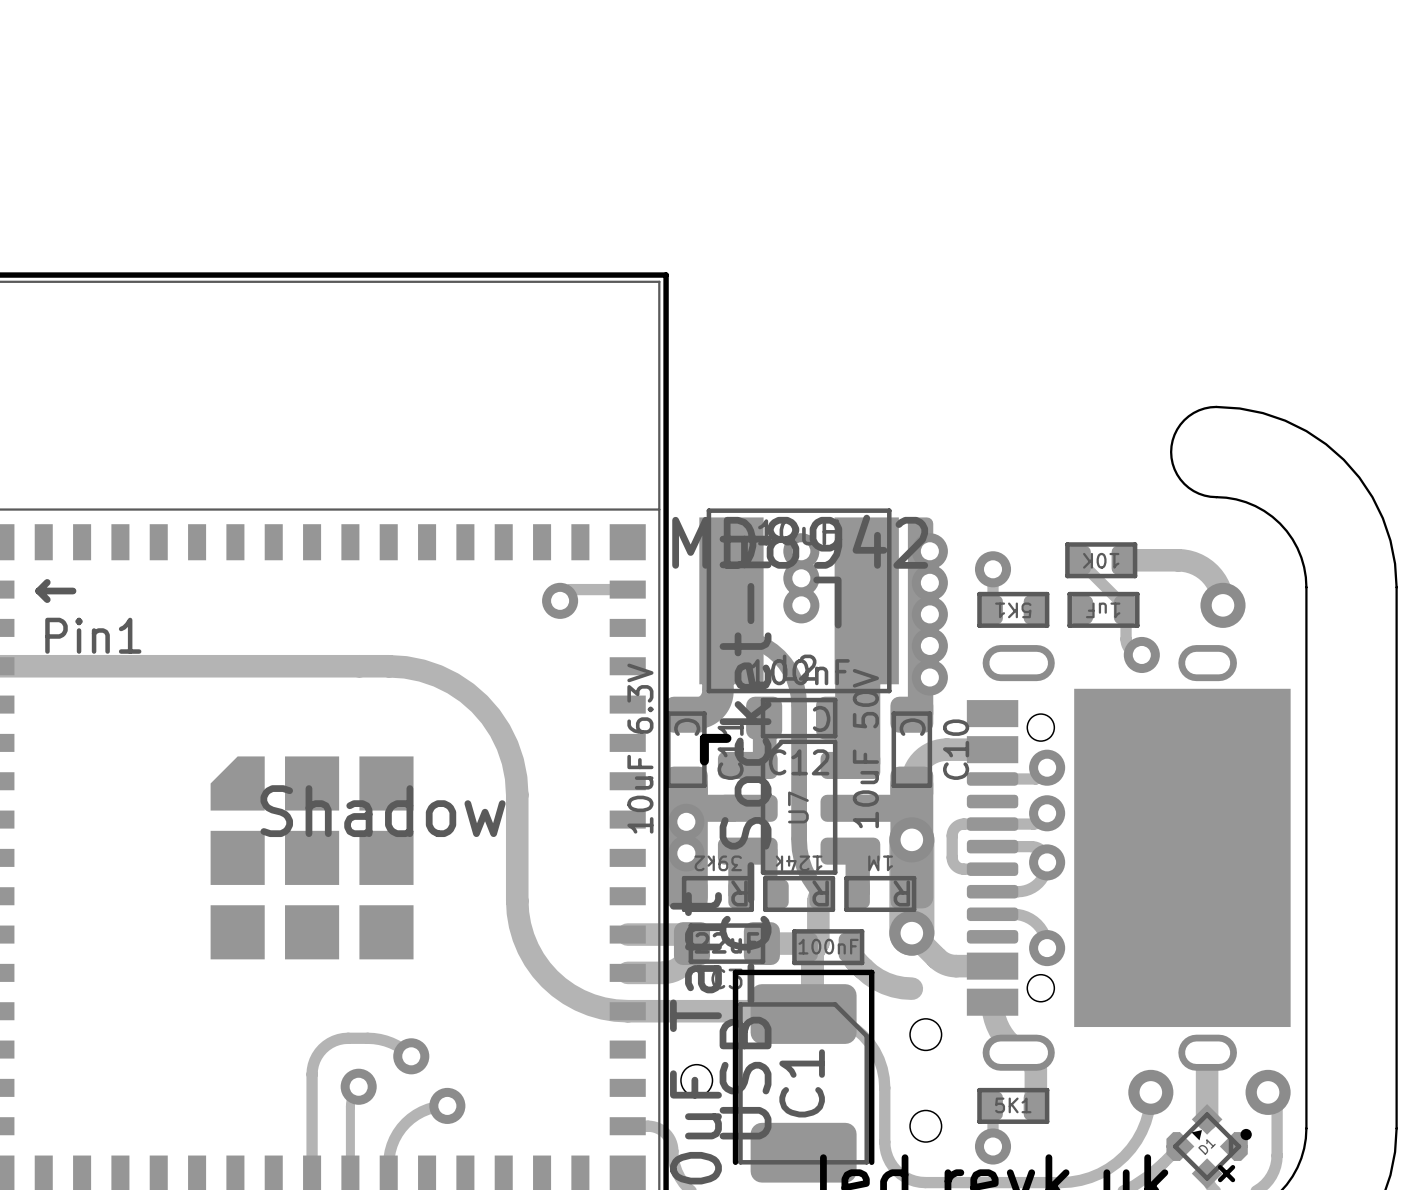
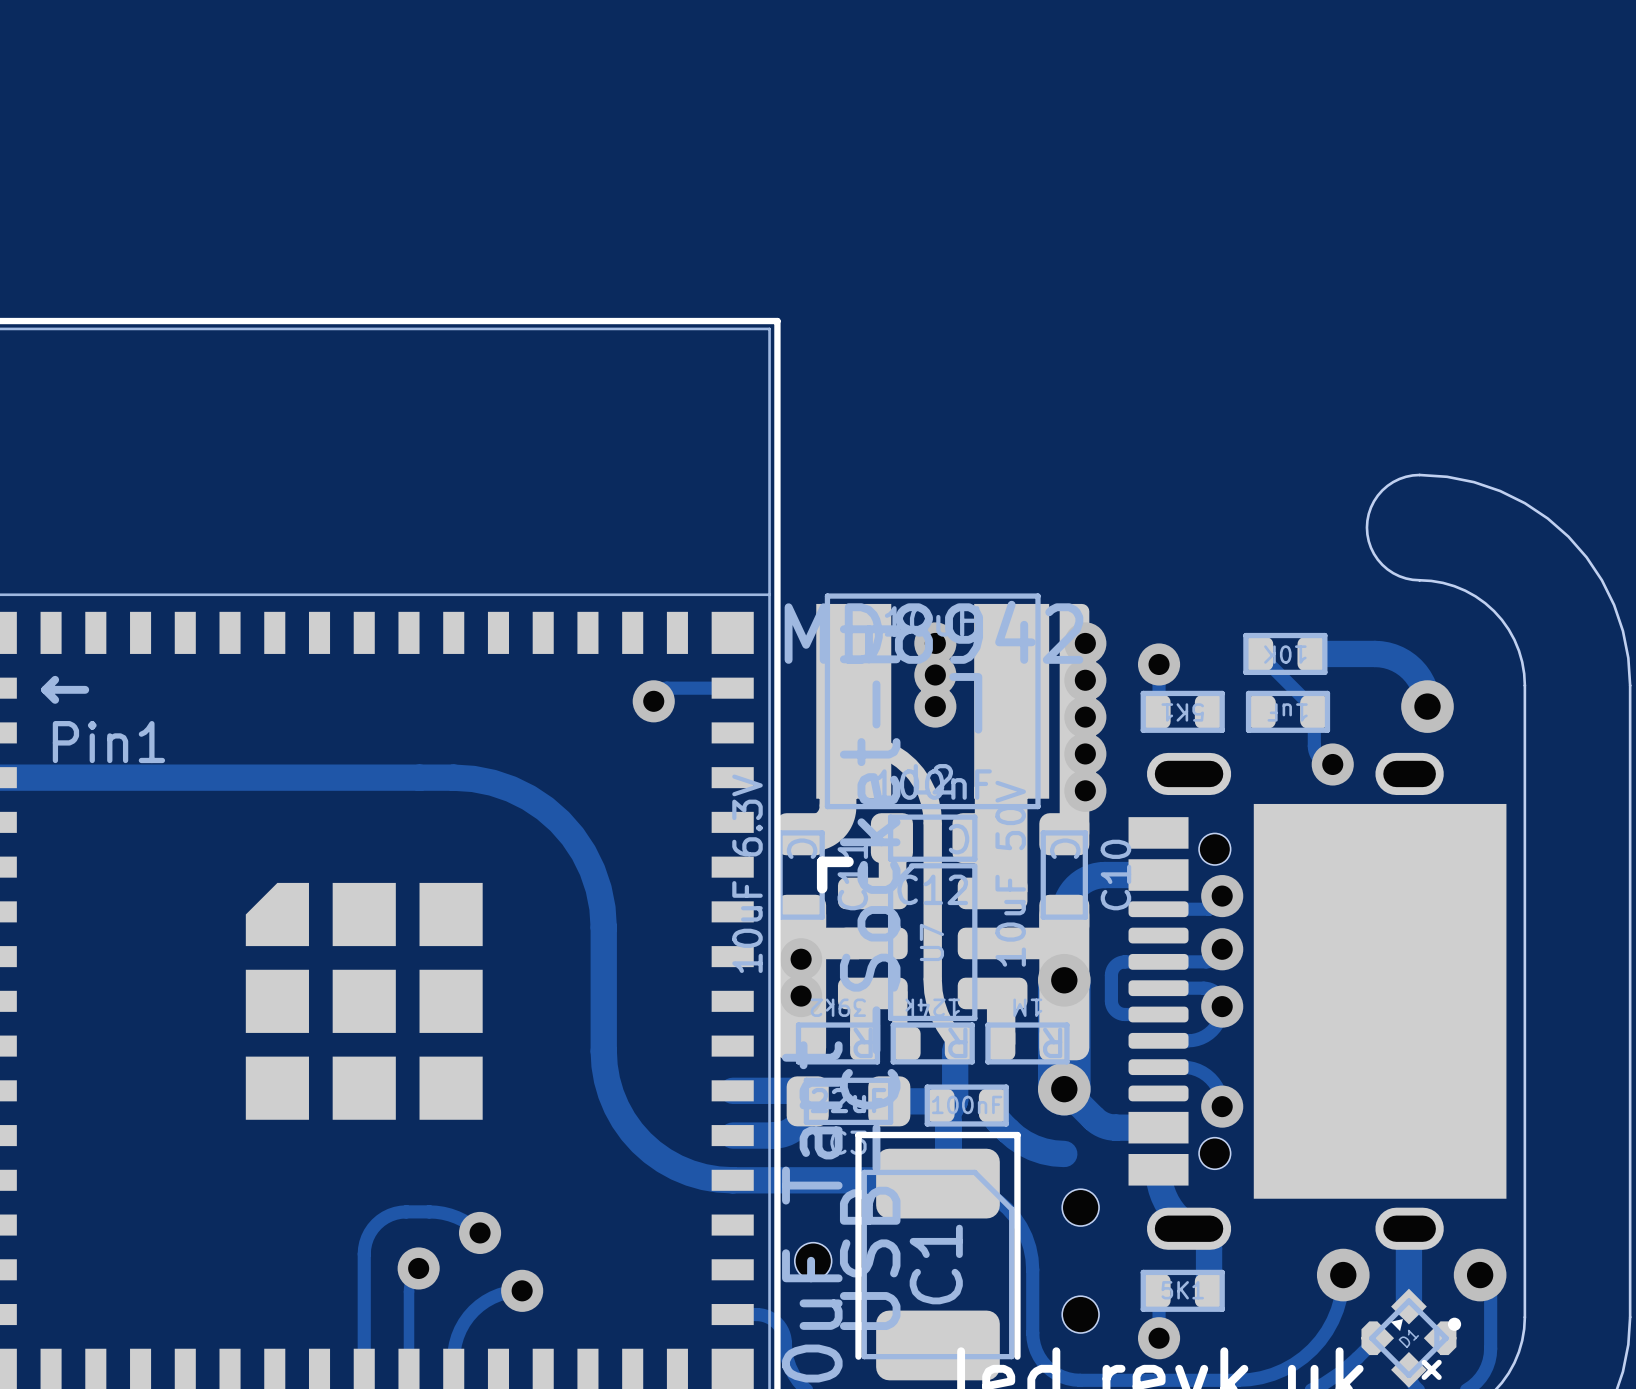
drawing: [260, 785, 506, 838] -> none

